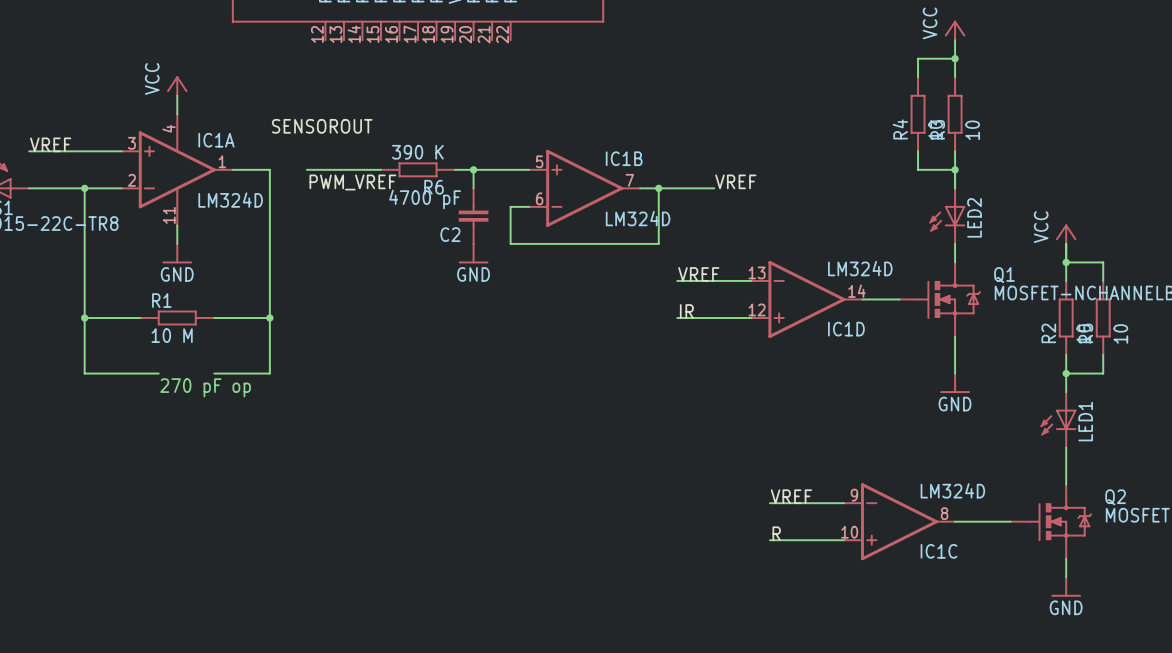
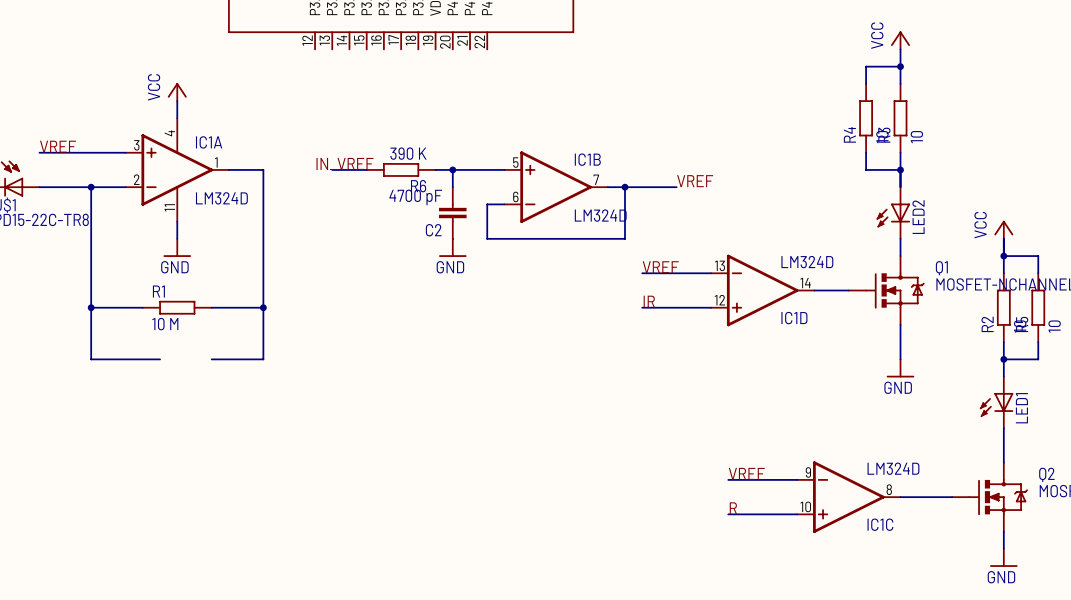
label: SENSOROUT (322, 126) -> none
wire: (306, 169) (343, 169) -> none
label: PWM_VREF (352, 182) -> IN_VREF (344, 163)
text: 270 pF op (205, 387) -> none

